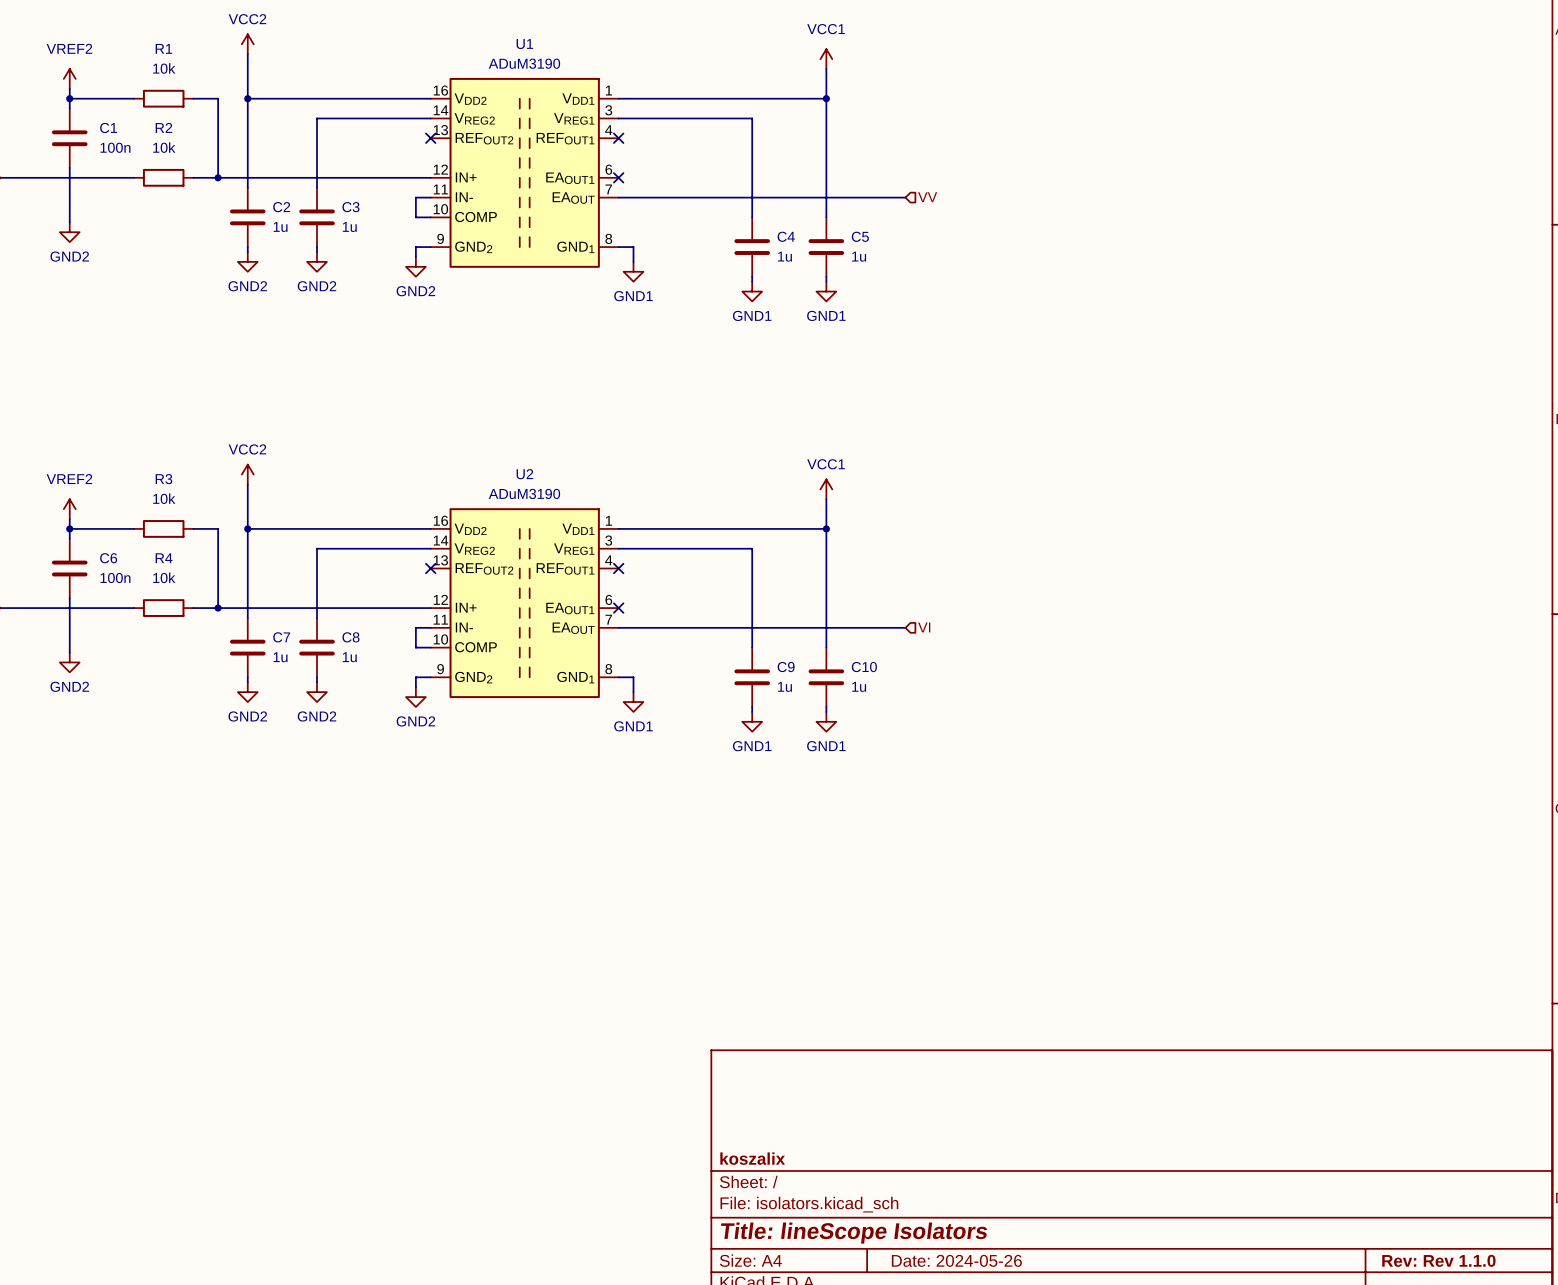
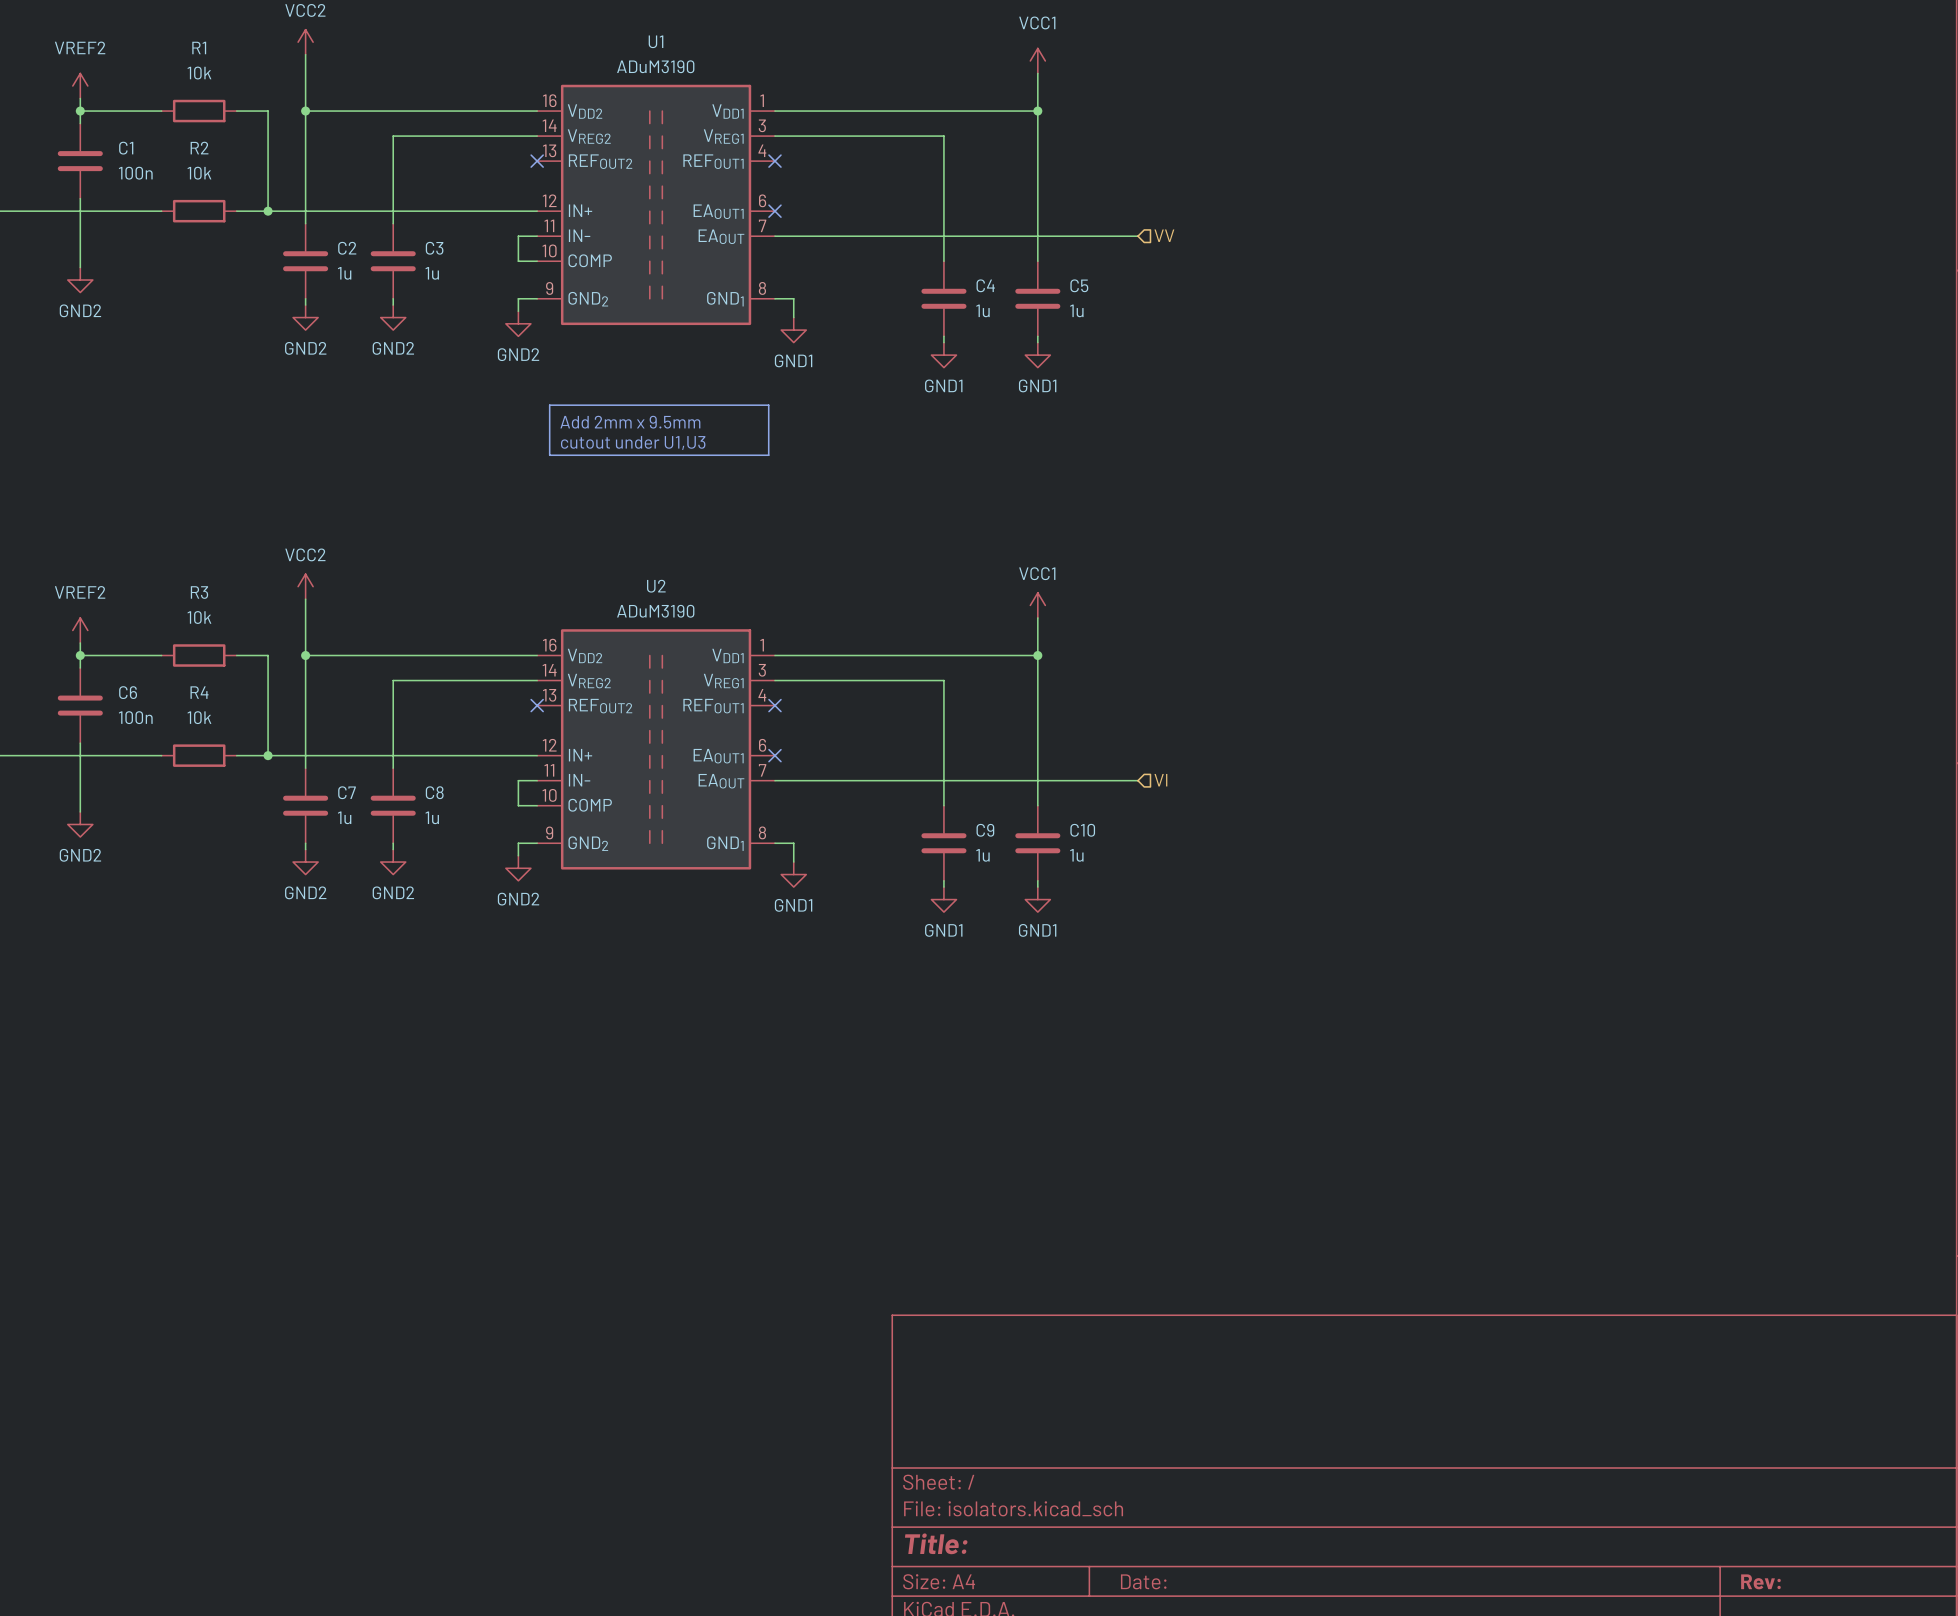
line: none -> (549, 405) (768, 405) (768, 455) (549, 455) (549, 405)
text: none -> Add 2mm x 9.5mm (630, 422)
text: none -> cutout under U1,U3 (633, 443)
title block: koszalix (752, 1158) -> none
title block: Title: lineScope Isolators (854, 1233) -> Title: (936, 1543)
title block: Date: 2024-05-26 (956, 1260) -> Date: (1143, 1581)
title block: Rev: Rev 1.1.0 (1438, 1260) -> Rev: (1760, 1581)

